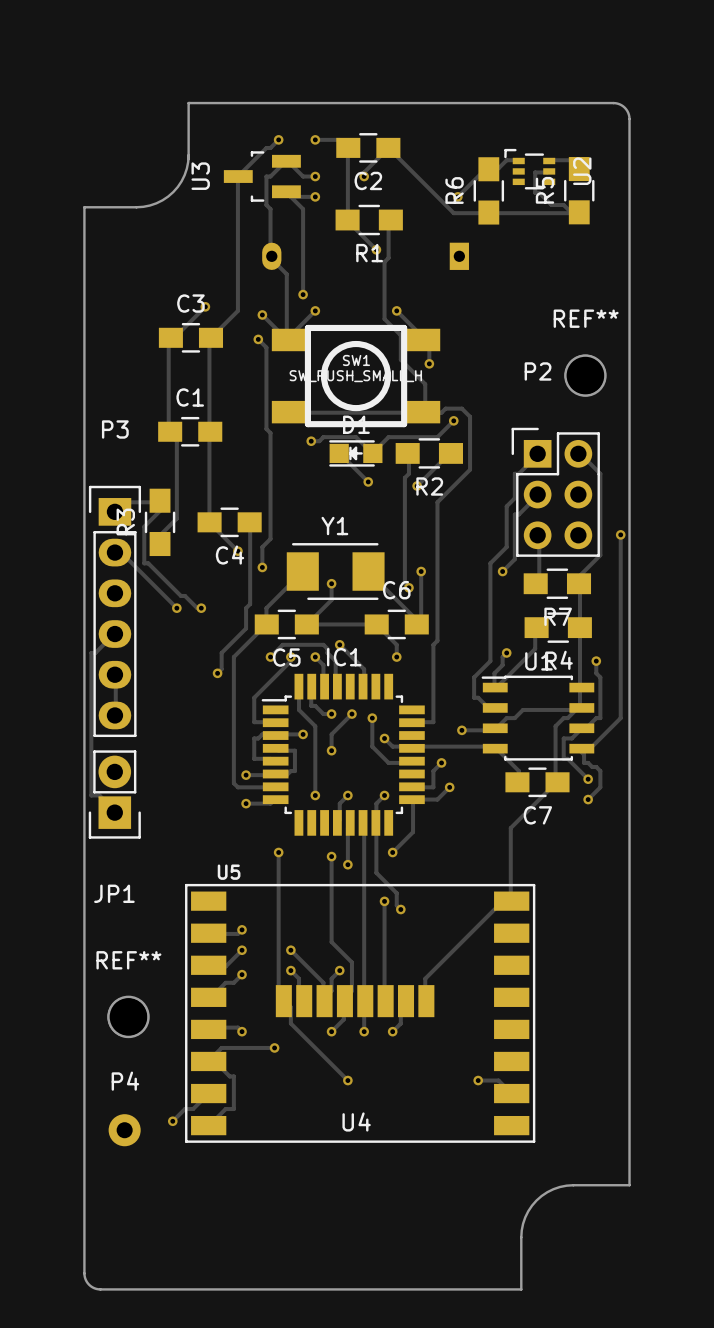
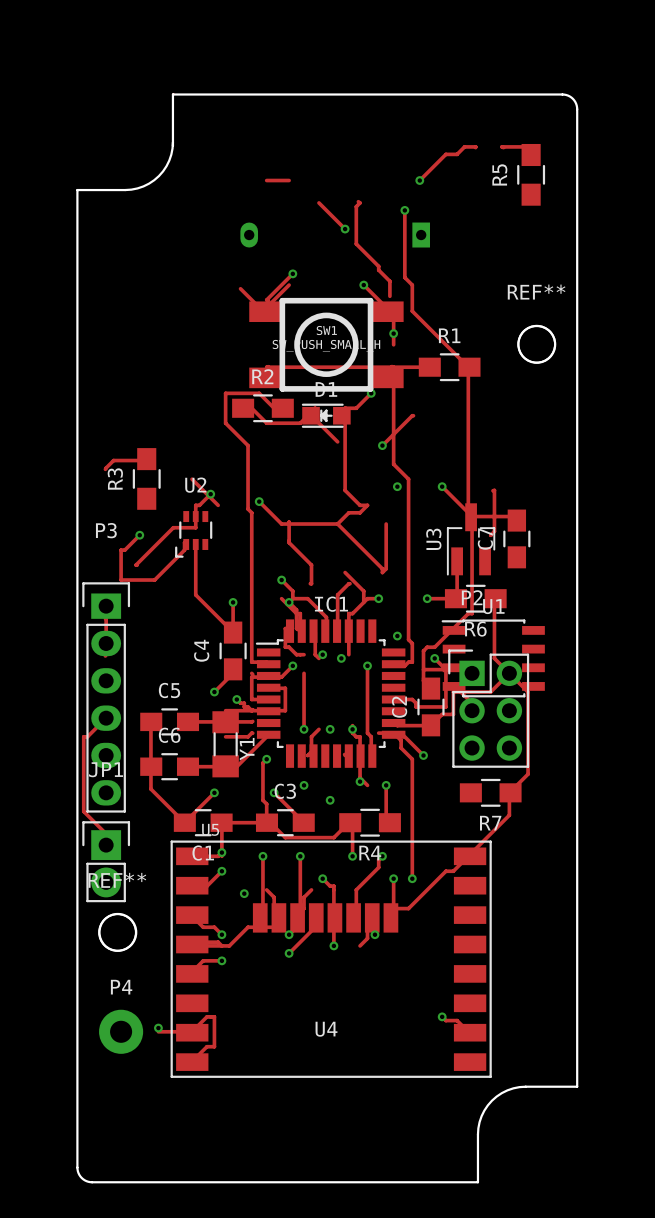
track: (278, 139) (270, 148) (266, 148) (237, 176) -> none
via: (278, 139) -> none
track: (315, 139) (339, 139) (347, 148) -> none
via: (315, 139) -> none
C2 rotation: 0° (368, 147) -> 90° clockwise (430, 706)
C2 position: (368, 147) -> (430, 706)
track: (347, 148) (347, 220) -> none
U3 footprint: [223, 151, 301, 202] -> [446, 503, 496, 576]
track: (286, 160) (303, 176) (315, 176) -> none
track: (286, 160) (270, 176) (266, 176) (266, 205) (270, 209) (270, 257) -> none
U2 rotation: 0° (529, 169) -> 90° counterclockwise (193, 534)
U2 position: (529, 169) -> (193, 534)
track: (549, 171) (535, 172) (535, 192) (539, 192) (551, 205) (563, 205) (571, 213) -> none
track: (237, 176) (237, 310) (209, 339) -> none
via: (315, 176) -> none
track: (364, 176) (364, 172) (388, 148) (453, 213) (579, 212) -> none
via: (364, 176) -> none
R6 name position: R6 (454, 190) -> R6 (475, 629)
R6 rotation: 0° (488, 190) -> 90° clockwise (475, 598)
R6 position: (488, 190) -> (475, 598)
track: (286, 191) (303, 209) (303, 294) -> none
via: (315, 196) -> none
R1 position: (369, 220) -> (449, 367)
track: none -> (404, 210) (404, 277) (412, 285) (412, 311) (468, 367)
via: none -> (404, 210)
R1 name position: R1 (369, 253) -> R1 (449, 335)
track: (270, 257) (286, 274) (286, 339) (288, 339) -> none
track: (388, 257) (384, 262) (384, 319) (400, 335) (400, 359) (425, 384) (425, 412) (423, 412) -> (356, 236) (356, 243) (378, 266) (378, 270) (389, 281) (389, 296)
via: (303, 294) -> none
track: none -> (292, 273) (266, 299) (268, 300)
via: none -> (292, 273)
track: (205, 306) (168, 343) (168, 433) -> none
via: (205, 306) -> none
via: (315, 310) -> none
via: (262, 314) -> none
C3 position: (190, 337) -> (285, 822)
track: (209, 339) (209, 522) -> none
track: (258, 339) (266, 347) (266, 428) (270, 433) (270, 486) -> (282, 408) (274, 408) (259, 393) (225, 393) (225, 423) (248, 445)
via: (258, 339) -> none
track: none -> (393, 333) (393, 344)
C1 name position: C1 (190, 397) -> C1 (203, 853)
track: none -> (268, 366) (266, 367) (429, 367)
track: none -> (391, 366) (393, 367) (393, 464) (408, 479) (408, 639) (412, 643) (412, 662) (408, 662) (404, 665) (393, 665) (393, 664)
track: none -> (468, 367) (468, 512)
track: (288, 412) (286, 412) (441, 412) (445, 408) (461, 408) (470, 416) (470, 469) (437, 502) (437, 640) (433, 644) (433, 722) (411, 722) -> none
track: (453, 420) (437, 437) (388, 437) (372, 453) (356, 437) (323, 437) (319, 441) (311, 441) -> none
via: (453, 420) -> none
track: none -> (371, 393) (356, 408) (345, 408) (345, 490) (360, 505) (367, 505) (360, 512) (348, 512) (337, 524) (281, 524) (259, 501)
via: none -> (371, 393)
C1 position: (190, 431) -> (203, 822)
track: (168, 433) (176, 441) (176, 518) (160, 534) (160, 544) -> none
via: (311, 441) -> none
track: none -> (243, 408) (251, 408) (266, 423) (300, 423) (314, 408)
track: (407, 453) (408, 473) (404, 477) (404, 583) (408, 587) -> none
R2 position: (429, 453) -> (262, 408)
track: (537, 453) (539, 453) (518, 473) (514, 473) (514, 498) (506, 506) (506, 547) (490, 563) (490, 661) (474, 677) (474, 697) (478, 697) (490, 709) (494, 709) (495, 707) -> none
track: (578, 453) (600, 473) (600, 555) (580, 575) (580, 709) -> none
via: (368, 481) -> none
R2 name position: R2 (429, 486) -> R2 (262, 376)
P2 position: (555, 492) -> (488, 708)
track: (537, 494) (539, 494) (518, 514) (514, 514) (514, 559) (502, 571) -> none
track: (160, 500) (160, 510) (144, 526) (144, 563) (148, 563) (180, 595) (185, 595) (197, 608) (201, 608) -> none
C4 rotation: 0° (229, 522) -> 90° clockwise (233, 650)
C4 position: (229, 522) -> (233, 650)
track: (249, 522) (250, 604) (246, 608) (246, 628) (221, 652) (221, 669) (217, 673) -> none
Y1 name position: Y1 (334, 526) -> Y1 (247, 749)
via: none -> (397, 486)
track: none -> (442, 486) (472, 516)
via: none -> (442, 486)
track: (620, 534) (620, 718) (588, 750) (580, 750) -> none
via: (620, 534) -> none
track: none -> (210, 494) (199, 505) (195, 505) (195, 527) (173, 527) (137, 565)
track: (270, 538) (262, 547) (262, 567) -> (248, 494) (248, 509) (251, 512) (251, 662) (266, 662) (270, 665) (268, 664)
Y1 footprint: [286, 543, 385, 600] -> [212, 711, 239, 778]
via: none -> (259, 501)
via position: (237, 551) -> (210, 494)
track: (114, 552) (119, 551) (176, 608) -> none
track: none -> (472, 516) (472, 613) (468, 613) (434, 647) (427, 647) (423, 650) (423, 680) (430, 688)
track: none -> (472, 516) (513, 516) (516, 520)
via: (262, 567) -> none
track: none -> (289, 522) (289, 542) (311, 565) (310, 583)
track: (303, 571) (266, 608) (266, 624) (233, 657) (233, 783) (237, 787) -> (188, 721) (218, 721)
via: (421, 571) -> none
via: (502, 571) -> none
track: none -> (139, 535) (124, 550) (121, 550) (121, 580) (154, 580) (184, 550) (184, 542) (186, 544)
via: none -> (139, 535)
track: (331, 583) (331, 600) (307, 624) -> none
via: (331, 583) -> none
R7 position: (557, 583) -> (490, 792)
via: (408, 587) -> none
track: none -> (195, 544) (195, 594) (233, 632)
via: (176, 608) -> none
via: (201, 608) -> none
P3 position: (114, 611) -> (106, 697)
track: none -> (457, 561) (457, 598) (427, 598)
C5 position: (286, 624) -> (169, 721)
track: (306, 624) (376, 624) -> none
C6 position: (396, 624) -> (169, 766)
track: (536, 627) (535, 648) (494, 689) (494, 673) (502, 665) (502, 657) (506, 652) -> none
R4 position: (558, 627) -> (370, 822)
track: none -> (281, 580) (292, 591) (292, 598) (307, 598) (326, 617) (326, 632) (325, 631)
via: none -> (281, 580)
track: (114, 634) (115, 632) (95, 652) (91, 652) (91, 795) (99, 795) (114, 812) -> none
track: none -> (350, 583) (337, 594) (337, 631)
track: (339, 644) (364, 669) (363, 686) -> none
via: (339, 644) -> none
track: none -> (281, 598) (296, 613) (300, 613) (300, 632) (301, 631)
track: none -> (378, 598) (367, 598) (352, 613) (348, 613) (348, 654)
via: none -> (427, 598)
via: (506, 652) -> none
track: none -> (495, 598) (494, 658) (528, 692) (528, 774) (509, 792)
track: none -> (233, 602) (233, 632)
track: (270, 657) (282, 644) (323, 644) (327, 648) (327, 652) (335, 661) (335, 685) (337, 686) -> none
via position: (270, 657) -> (233, 602)
C5 name position: C5 (286, 657) -> C5 (169, 690)
track: (290, 657) (290, 661) (254, 697) (254, 722) (275, 722) -> none
via: (290, 657) -> none
via position: (396, 657) -> (378, 598)
track: (596, 661) (596, 673) (600, 677) (600, 718) (596, 718) (584, 730) (580, 730) -> none
via: (596, 661) -> none
via: (217, 673) -> none
track: (298, 686) (299, 709) (315, 726) (315, 795) -> none
track: none -> (313, 631) (315, 632) (315, 654) (318, 658)
via: none -> (397, 636)
track: (575, 709) (555, 726) (555, 783) -> none
track: (580, 709) (522, 709) (514, 718) (506, 718) (494, 730) (495, 728) -> none
via: (331, 714) -> none
track: (351, 714) (331, 734) -> none
track: (372, 718) (372, 746) (388, 762) (413, 762) (411, 761) -> none
track: none -> (434, 658) (445, 669) (445, 706) (416, 706) (416, 703) (412, 699) (393, 699)
track: none -> (292, 665) (281, 677) (251, 677) (251, 699) (268, 699)
via: none -> (292, 665)
track: none -> (367, 665) (367, 733) (371, 736) (372, 756)
track: none -> (233, 669) (233, 673) (214, 692)
via position: (461, 730) -> (434, 658)
track: (580, 730) (571, 738) (563, 738) (563, 758) (567, 758) (588, 779) -> none
track: (303, 734) (262, 734) (258, 738) (254, 738) (254, 758) (270, 758) (274, 762) (275, 761) -> none
via: (303, 734) -> none
track: none -> (509, 673) (490, 692) (453, 692) (453, 714) (442, 714) (430, 725) (397, 725) (393, 723)
track: (384, 738) (392, 746) (490, 746) (494, 750) (495, 748) -> none
via position: (384, 738) -> (367, 665)
track: (275, 748) (274, 746) (278, 750) (294, 750) (294, 771) (290, 771) (286, 775) -> (268, 687) (285, 688) (285, 710) (262, 710)
track: none -> (304, 688) (304, 729)
via: (331, 750) -> none
track: (580, 750) (584, 754) (584, 762) (596, 766) (600, 771) (600, 787) (588, 799) -> none
via: none -> (214, 692)
IC1 position: (343, 754) -> (330, 693)
track: none -> (236, 699) (251, 710)
via: none -> (236, 699)
track: (441, 762) (433, 771) (433, 787) (411, 786) -> none
via: (441, 762) -> none
via: (246, 775) -> none
via: (588, 779) -> none
C7 rotation: 0° (537, 782) -> 90° clockwise (516, 538)
C7 position: (537, 782) -> (516, 538)
track: none -> (106, 718) (87, 736) (83, 736) (83, 811) (106, 833) (106, 845)
track: (555, 783) (510, 828) (510, 901) -> none
track: none -> (150, 721) (150, 789) (184, 822) (214, 792)
track: (449, 787) (437, 799) -> (423, 755) (401, 733)
via: (449, 787) -> none
track: none -> (352, 725) (352, 733) (356, 736) (360, 736) (360, 777) (367, 785)
JP1 rotation: 0° (114, 794) -> 180° (106, 861)
JP1 position: (114, 794) -> (106, 861)
via: (315, 795) -> none
via: none -> (304, 729)
via: (347, 795) -> none
via: none -> (330, 729)
track: (384, 795) (376, 803) (376, 872) (396, 893) (396, 905) (400, 909) -> none
track: (411, 799) (413, 832) (392, 852) -> none
via: (588, 799) -> none
track: none -> (268, 734) (270, 733) (236, 766) (188, 766)
track: none -> (393, 734) (393, 733) (401, 740) (401, 748) (412, 759) (412, 878)
via: (246, 803) -> none
track: (350, 822) (351, 823) (347, 828) (347, 864) -> none
track: (363, 822) (364, 966) -> (322, 878) (330, 886) (333, 886)
via: none -> (423, 755)
track: none -> (266, 759) (262, 762) (262, 800) (266, 804) (266, 822)
via: none -> (266, 759)
track: (278, 852) (278, 995) (290, 1007) (290, 1023) (347, 1080) -> none
via: (278, 852) -> none
track: (331, 856) (331, 942) (351, 962) (351, 990) (343, 999) (344, 1001) -> none
track: none -> (386, 785) (386, 818) (389, 822)
via: none -> (386, 785)
via: none -> (214, 792)
track: none -> (274, 792) (303, 822)
via: none -> (274, 792)
via position: (347, 864) -> (330, 800)
track: none -> (509, 792) (509, 815) (453, 871) (445, 871) (408, 908) (393, 908) (393, 878)
track: none -> (221, 822) (270, 822) (285, 837) (333, 837) (348, 822)
track: none -> (221, 822) (221, 856)
via: (384, 901) -> none
track: (510, 901) (502, 901) (425, 978) (426, 1001) -> none
via: (400, 909) -> none
track: none -> (262, 856) (262, 908) (264, 907)
via: none -> (300, 856)
track: (384, 933) (385, 1001) -> none
via: none -> (352, 856)
track: none -> (382, 856) (378, 860) (378, 867) (356, 889) (356, 908) (357, 907)
via: none -> (382, 856)
track: (290, 950) (323, 982) (323, 995) -> (300, 856) (300, 908) (296, 912)
via position: (290, 950) -> (262, 856)
via: none -> (393, 878)
via: none -> (412, 878)
via: (290, 970) -> none
via position: (339, 970) -> (322, 878)
track: (242, 974) (233, 982) (225, 982) (209, 999) (208, 997) -> none
via: (242, 974) -> none
via: none -> (244, 893)
track: none -> (282, 907) (277, 912) (277, 927) (248, 927) (229, 945) (192, 944)
track: none -> (192, 915) (203, 927) (214, 927) (221, 934)
track: (343, 1011) (343, 1019) (331, 1031) -> (315, 927) (289, 953)
U5 position: (360, 1013) -> (331, 959)
via: none -> (221, 934)
via: none -> (289, 934)
via: (242, 1031) -> none
via: (331, 1031) -> none
via position: (392, 1031) -> (374, 934)
via: none -> (289, 953)
track: (242, 1047) (274, 1047) -> none
via: none -> (221, 960)
via: (274, 1047) -> none
track: (208, 1061) (213, 1060) (229, 1076) (233, 1076) (233, 1109) -> (192, 1062) (206, 1046) (214, 1046) (214, 1016)
via: (347, 1080) -> none
track: (478, 1080) (498, 1080) (511, 1093) -> none
via position: (478, 1080) -> (442, 1016)
track: (208, 1093) (193, 1109) (185, 1109) (172, 1121) -> none
track: none -> (442, 1016) (445, 1020) (457, 1020) (470, 1032)
P4 footprint: [108, 1114, 141, 1147] -> [99, 1009, 144, 1054]
track: none -> (158, 1031) (192, 1032)

